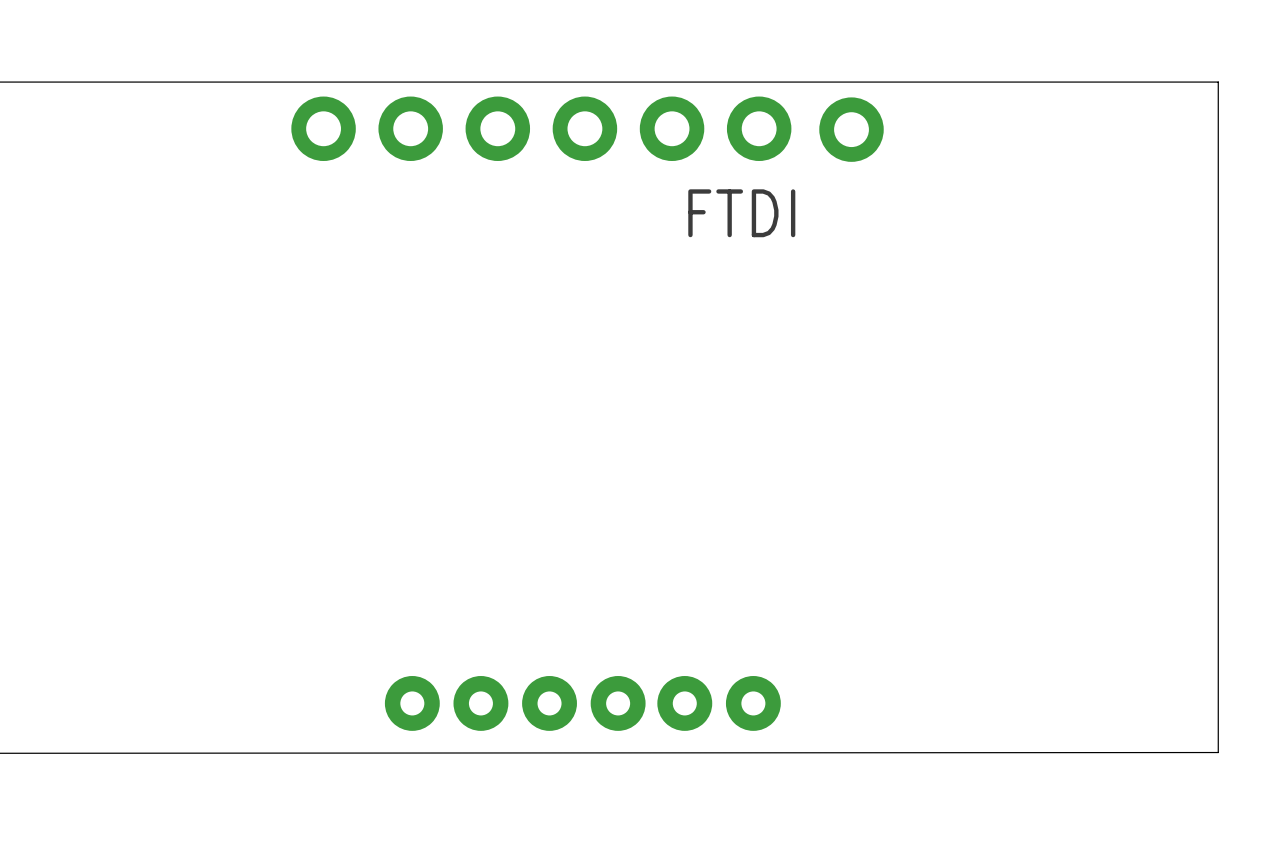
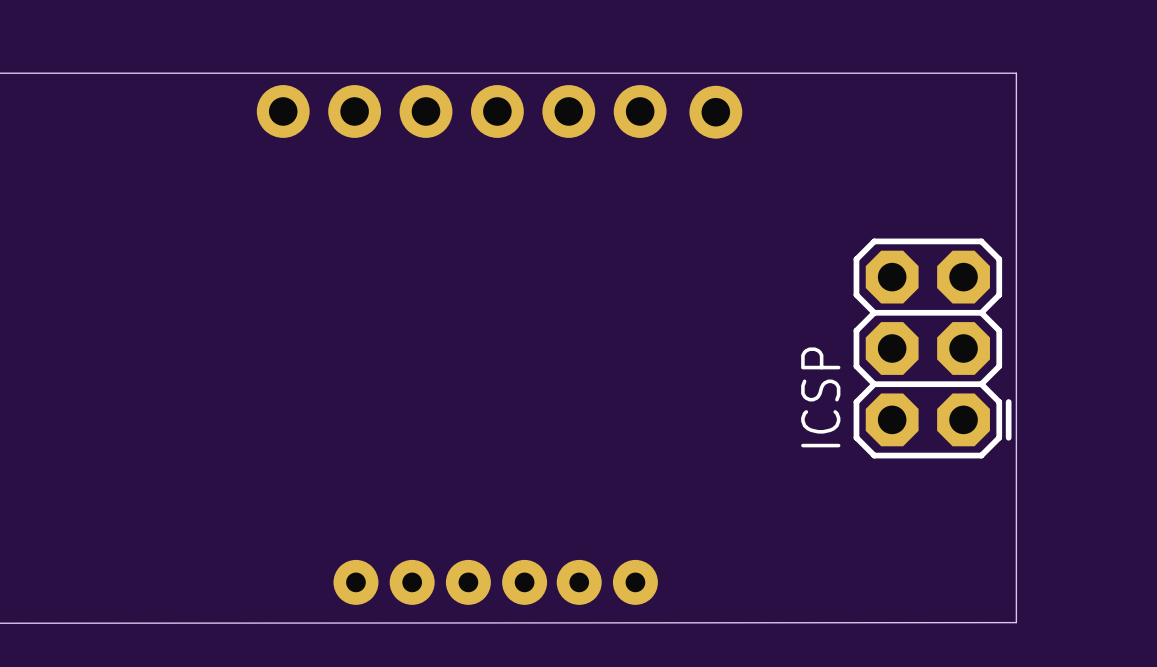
FTDI name: FTDI (741, 213) -> none
ICSP: none -> (932, 348)

